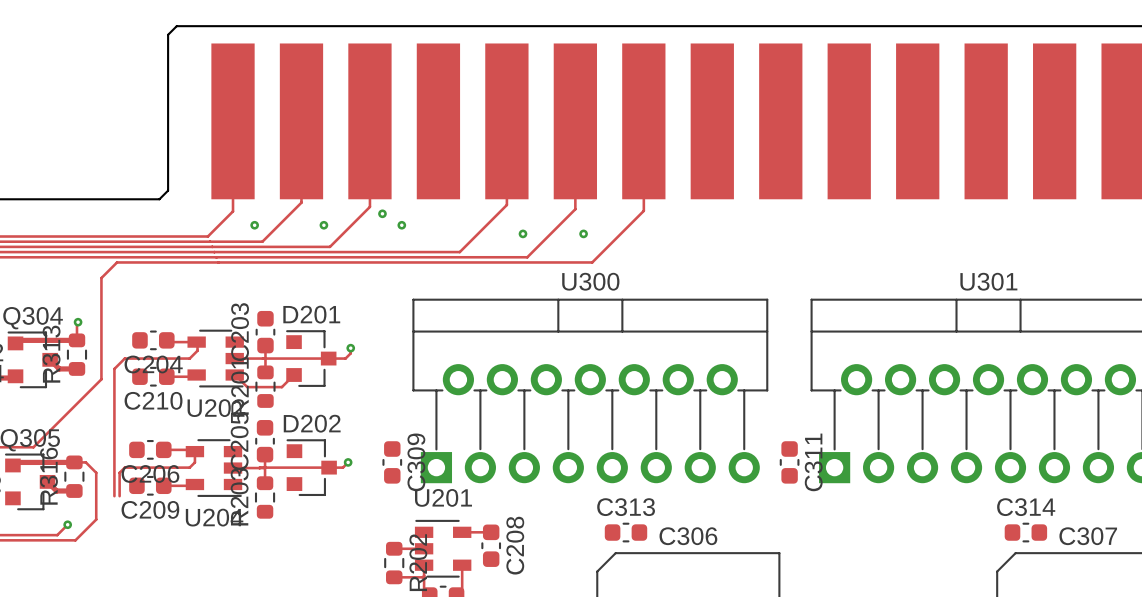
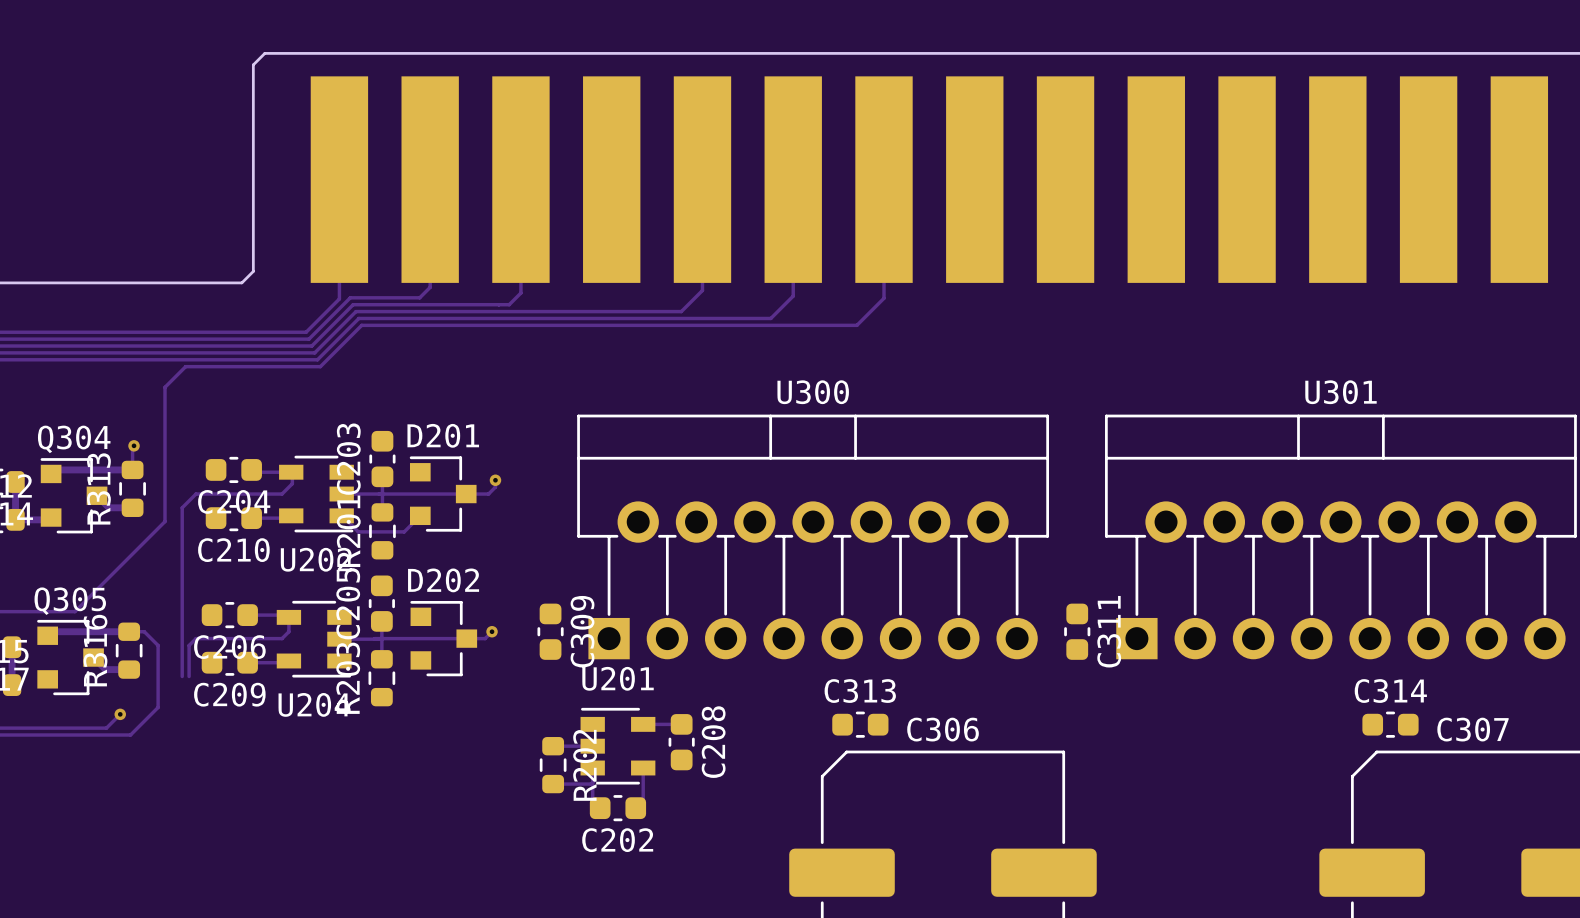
track: (293, 210) (262, 241) (210, 241) -> (419, 297) (350, 297) (308, 339)
via: (382, 213) -> none
track: (361, 215) (329, 246) (212, 246) -> (509, 304) (353, 304) (311, 346)
track: (490, 220) (459, 252) (214, 252) -> (681, 311) (356, 311) (314, 352)
via: (254, 225) -> none
via: (323, 225) -> none
via: (401, 225) -> none
track: (558, 226) (527, 257) (216, 257) -> (770, 318) (358, 318) (317, 359)
track: (623, 231) (592, 262) (218, 262) -> (856, 325) (361, 325) (320, 366)
via: (522, 233) -> none
via: (583, 233) -> none

